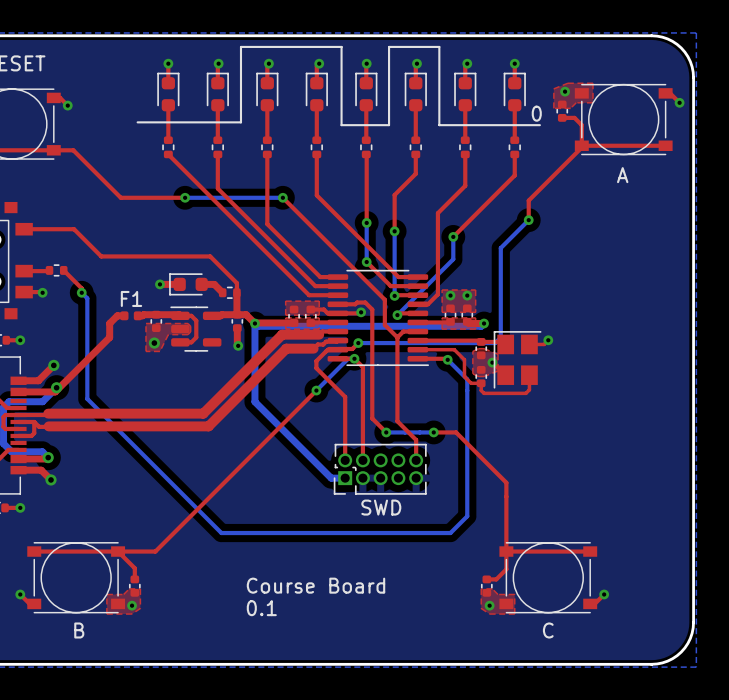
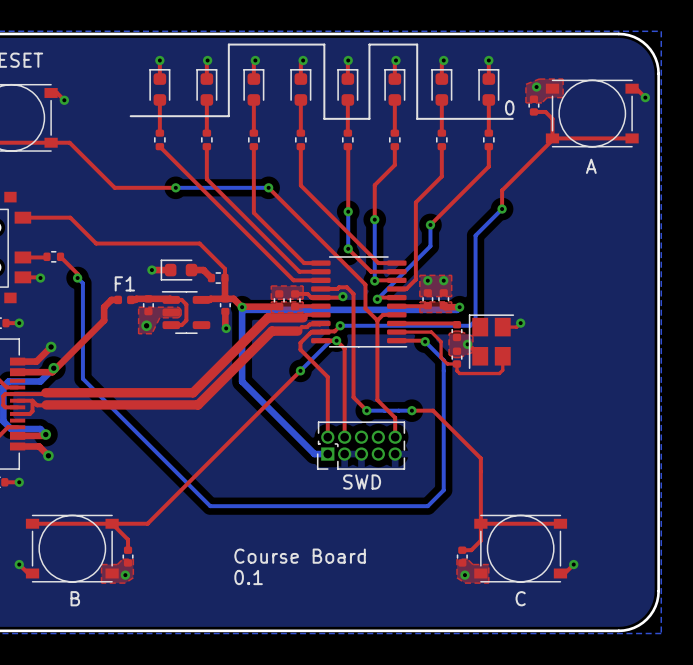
top track: (481, 341) (503, 341) (505, 344) -> none

